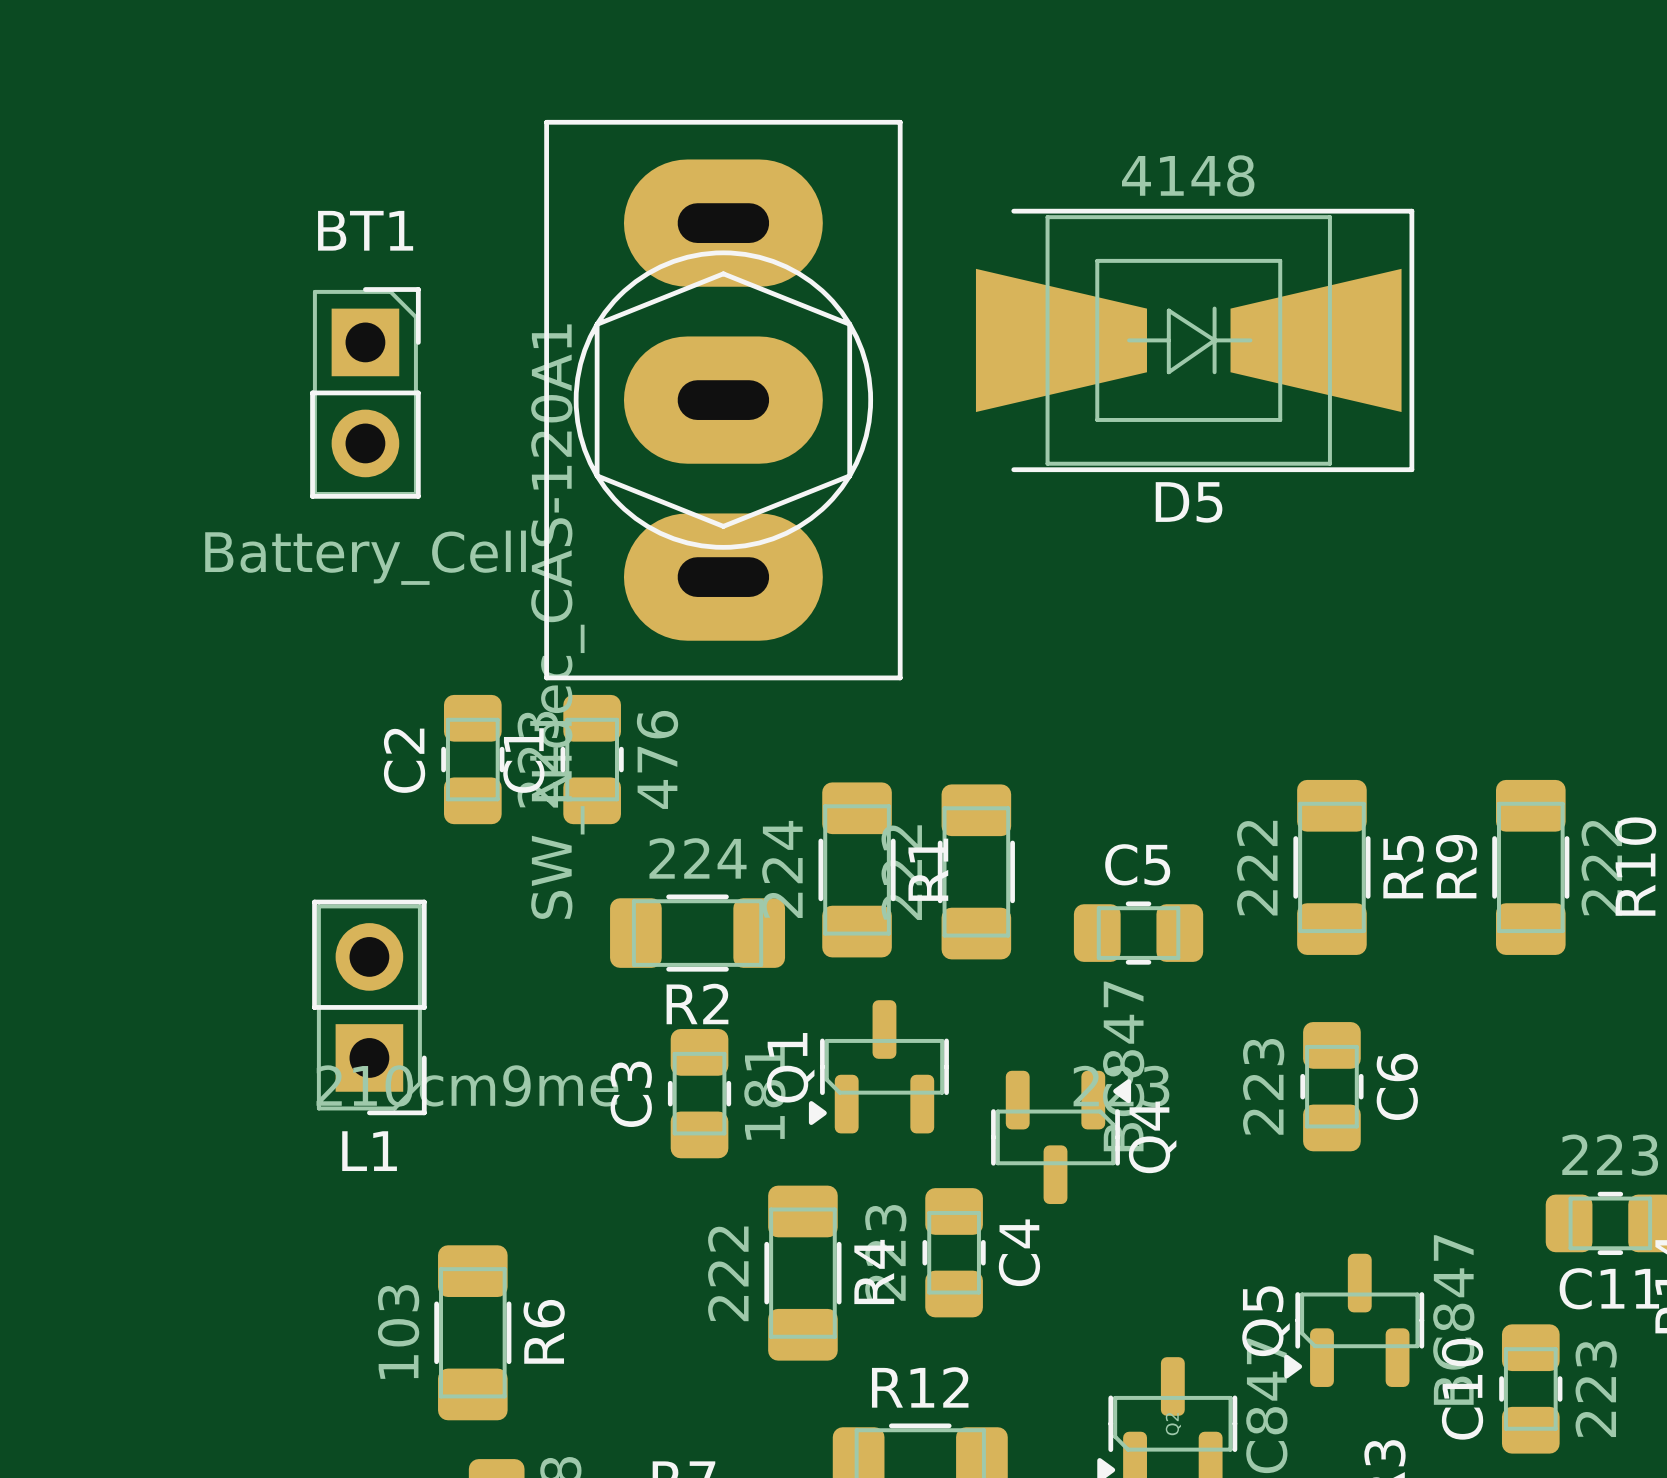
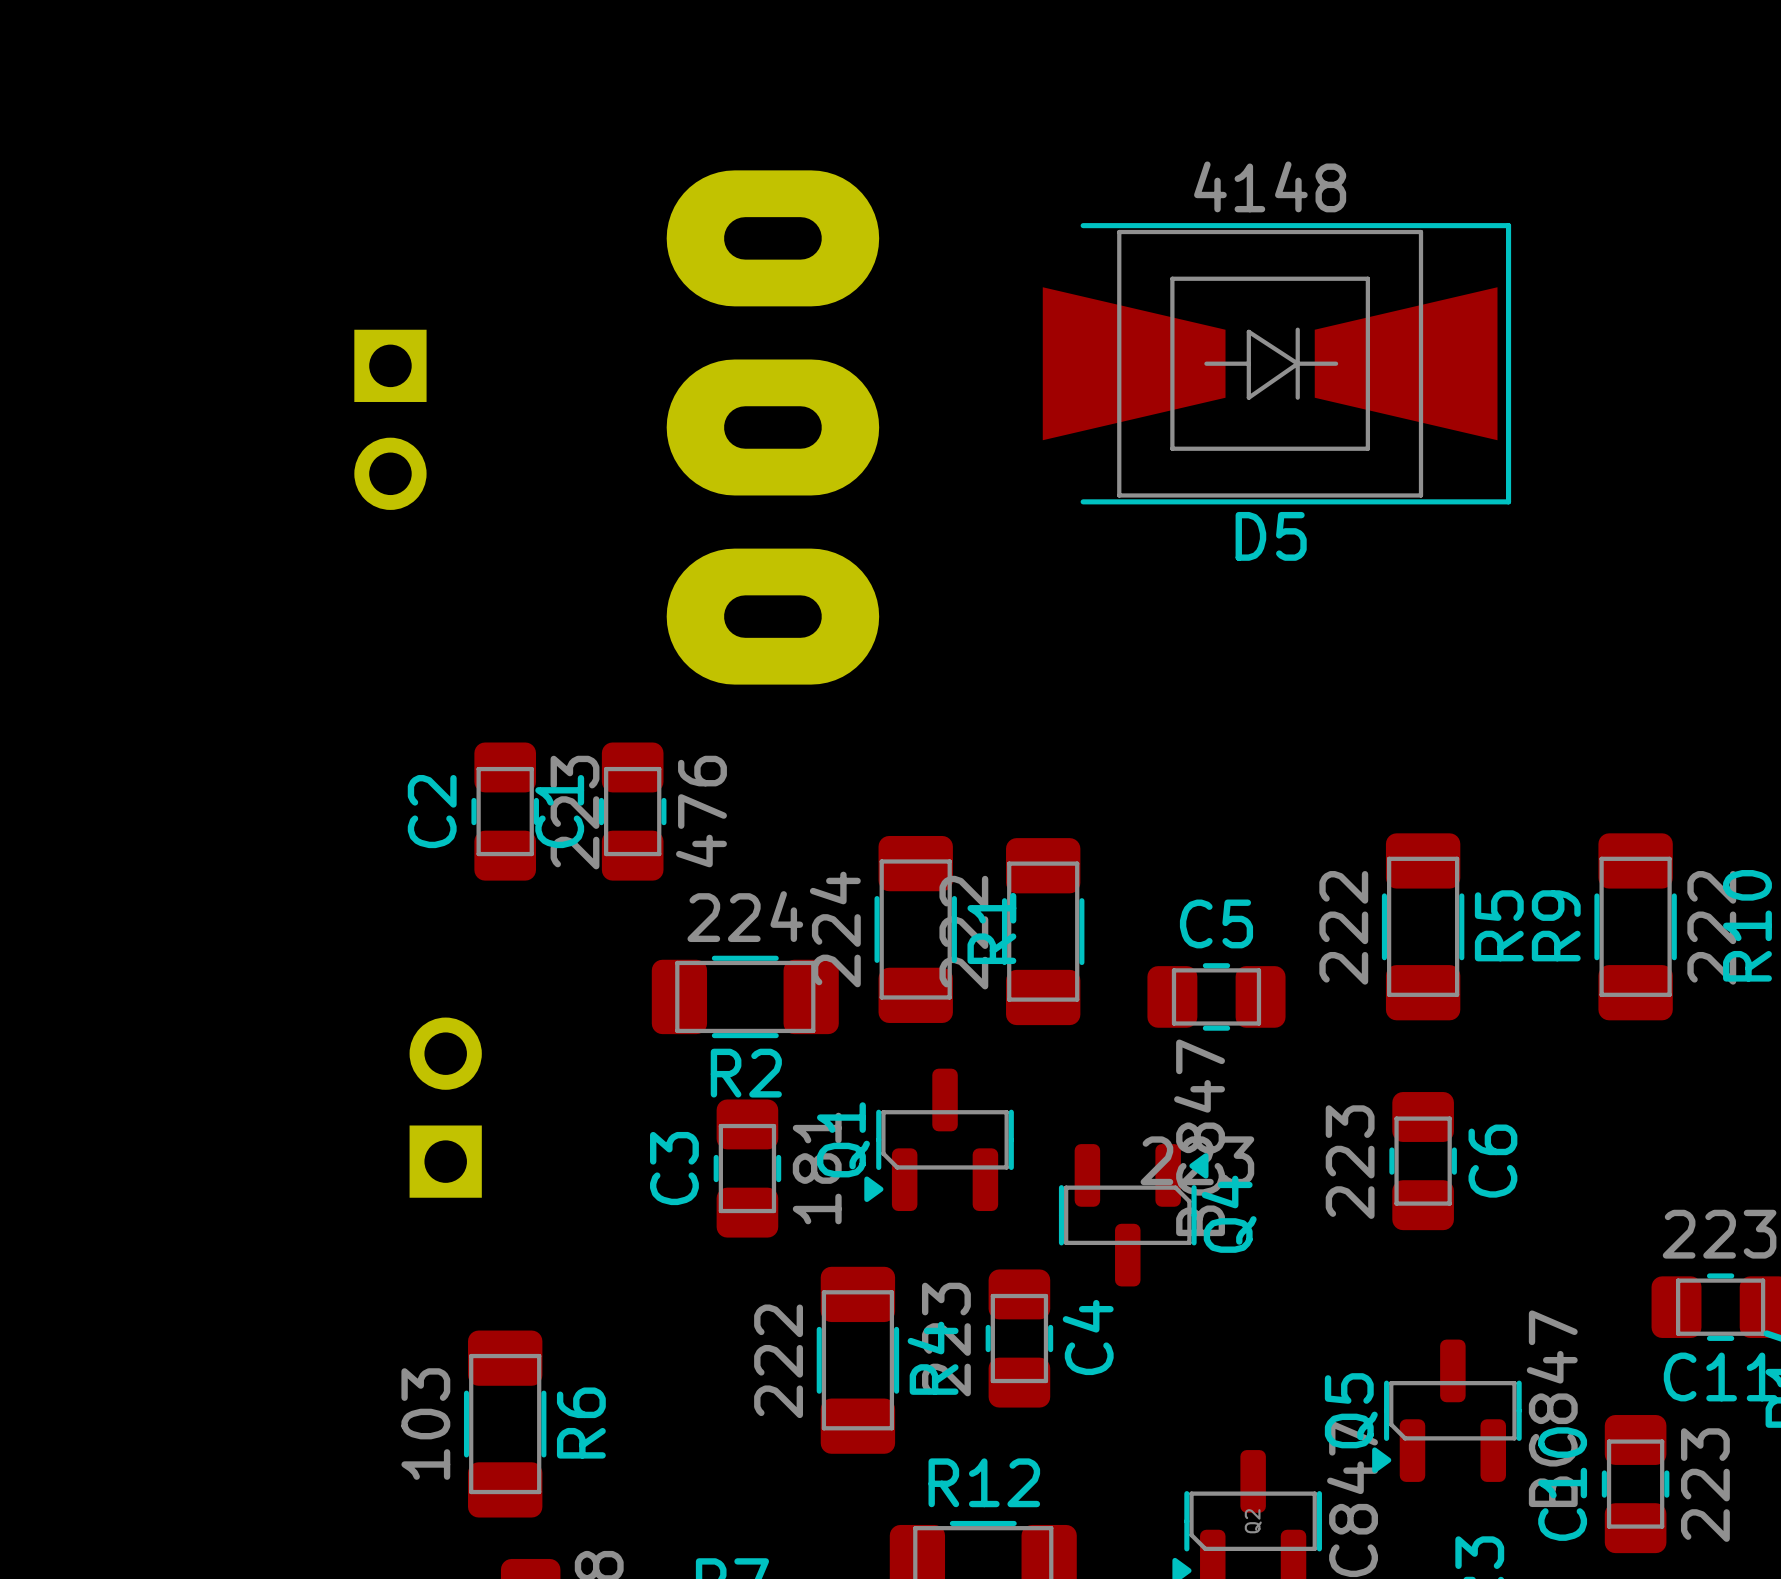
BT1 side: top (365, 392) -> bottom (390, 419)
part side: top (723, 400) -> bottom (772, 427)
L1 side: top (369, 1007) -> bottom (445, 1107)

